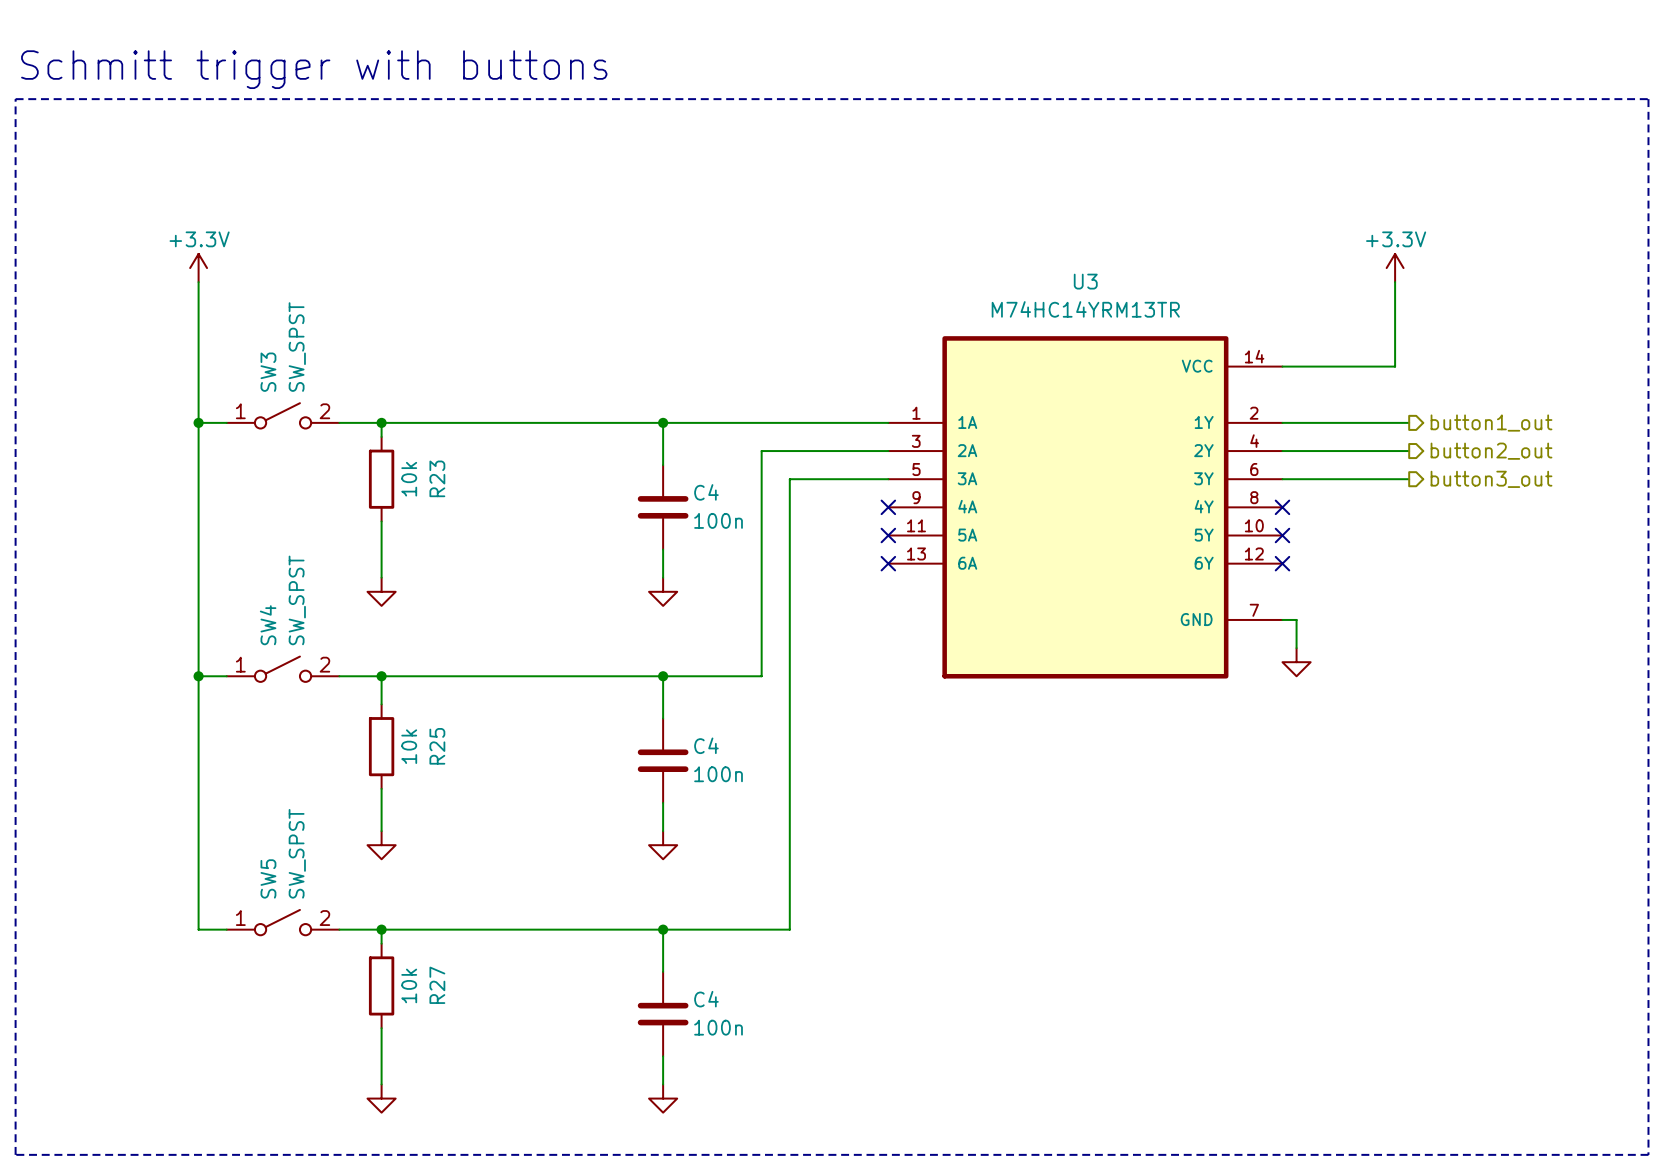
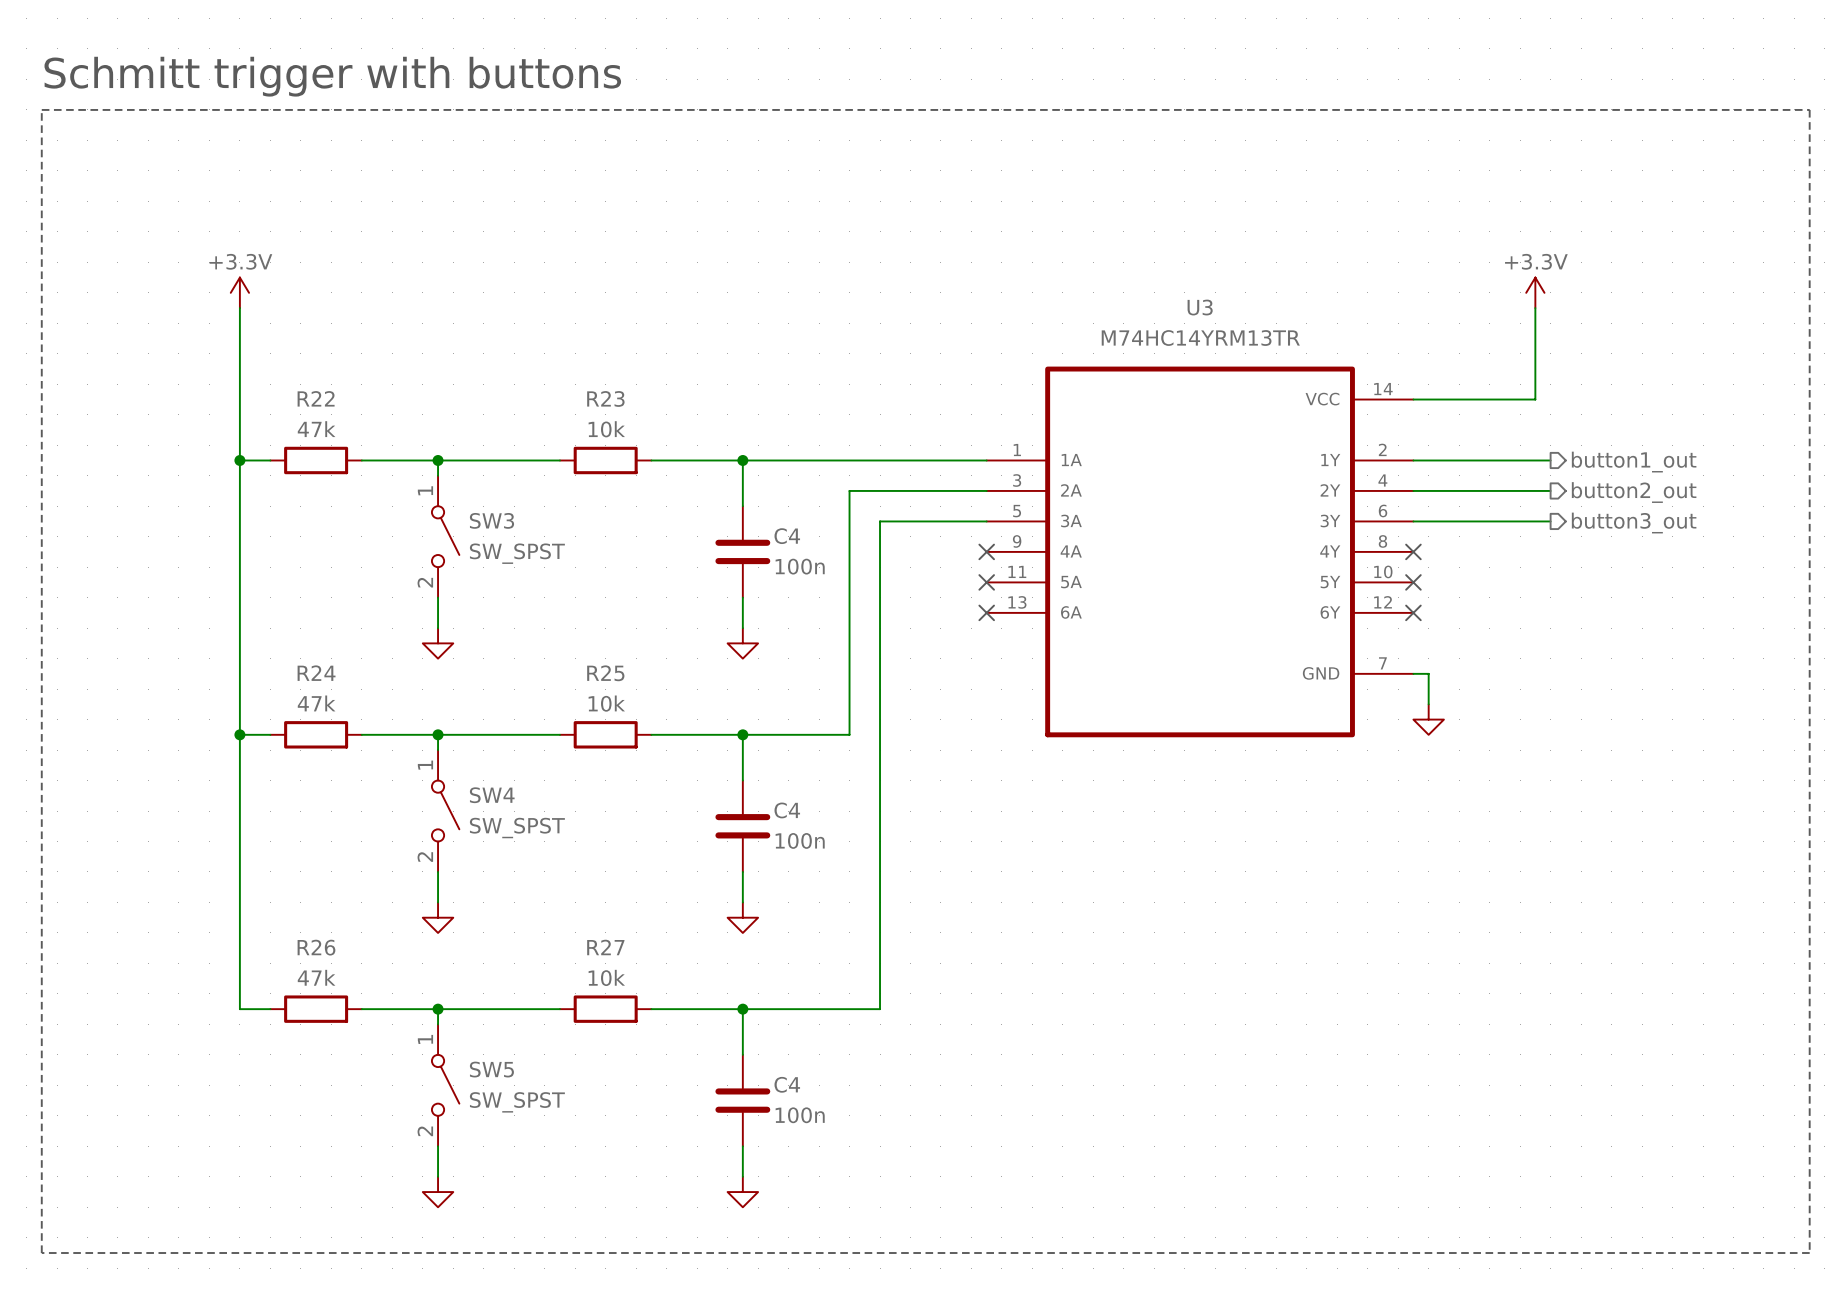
SW3 rotation: 0° (283, 415) -> 90° clockwise (445, 536)
SW3 position: (283, 415) -> (445, 536)
R22: none -> 47k (316, 460)
wire: (494, 422) (578, 422) -> none
R23 name position: R23 (437, 478) -> R23 (605, 398)
R23 rotation: 0° (381, 479) -> 90° clockwise (605, 460)
R23 position: (381, 479) -> (605, 460)
R23 value position: 10k (409, 479) -> 10k (606, 429)
SW4 rotation: 0° (283, 669) -> 90° clockwise (445, 811)
SW4 position: (283, 669) -> (445, 811)
R24: none -> 47k (316, 734)
wire: (494, 676) (578, 676) -> none
R25 rotation: 0° (381, 746) -> 90° clockwise (605, 734)
R25 position: (381, 746) -> (605, 734)
R25 value position: 10k (409, 746) -> 10k (606, 703)
R25 name position: R25 (437, 746) -> R25 (605, 673)
SW5 rotation: 0° (283, 922) -> 90° clockwise (445, 1085)
SW5 position: (283, 922) -> (445, 1085)
R26: none -> 47k (316, 1009)
wire: (494, 929) (578, 929) -> none
R27 rotation: 0° (381, 985) -> 90° clockwise (605, 1009)
R27 position: (381, 985) -> (605, 1009)
R27 value position: 10k (409, 985) -> 10k (606, 977)
R27 name position: R27 (437, 985) -> R27 (605, 947)

